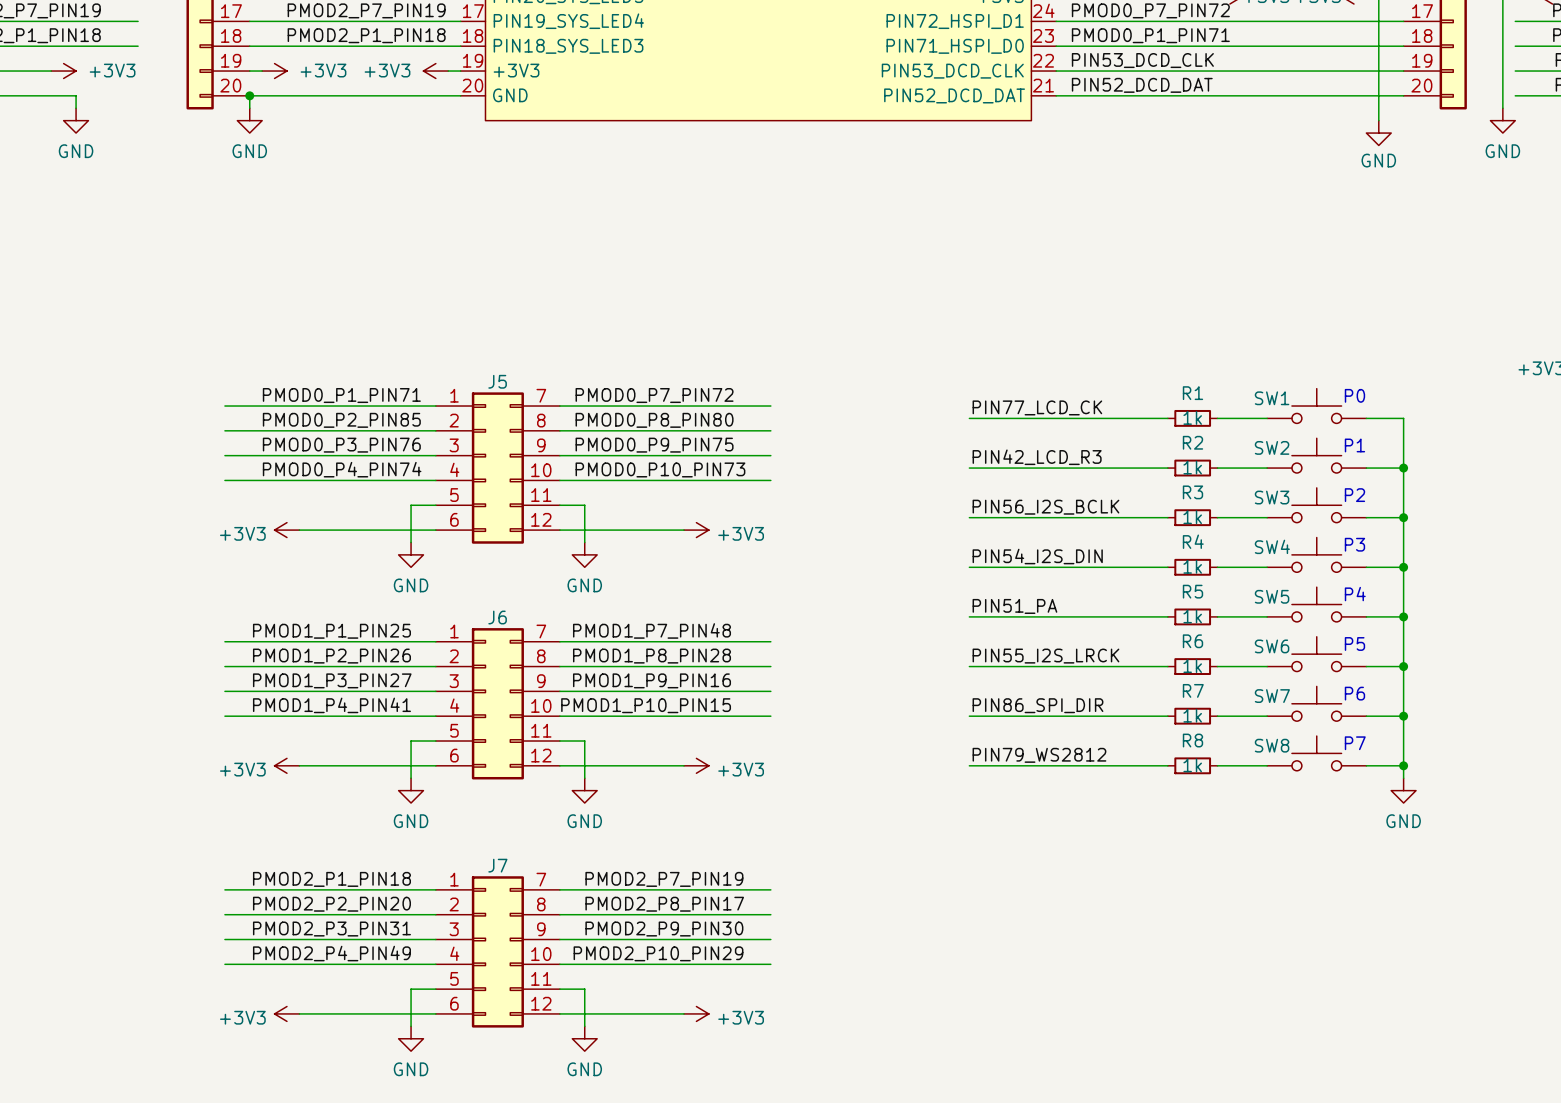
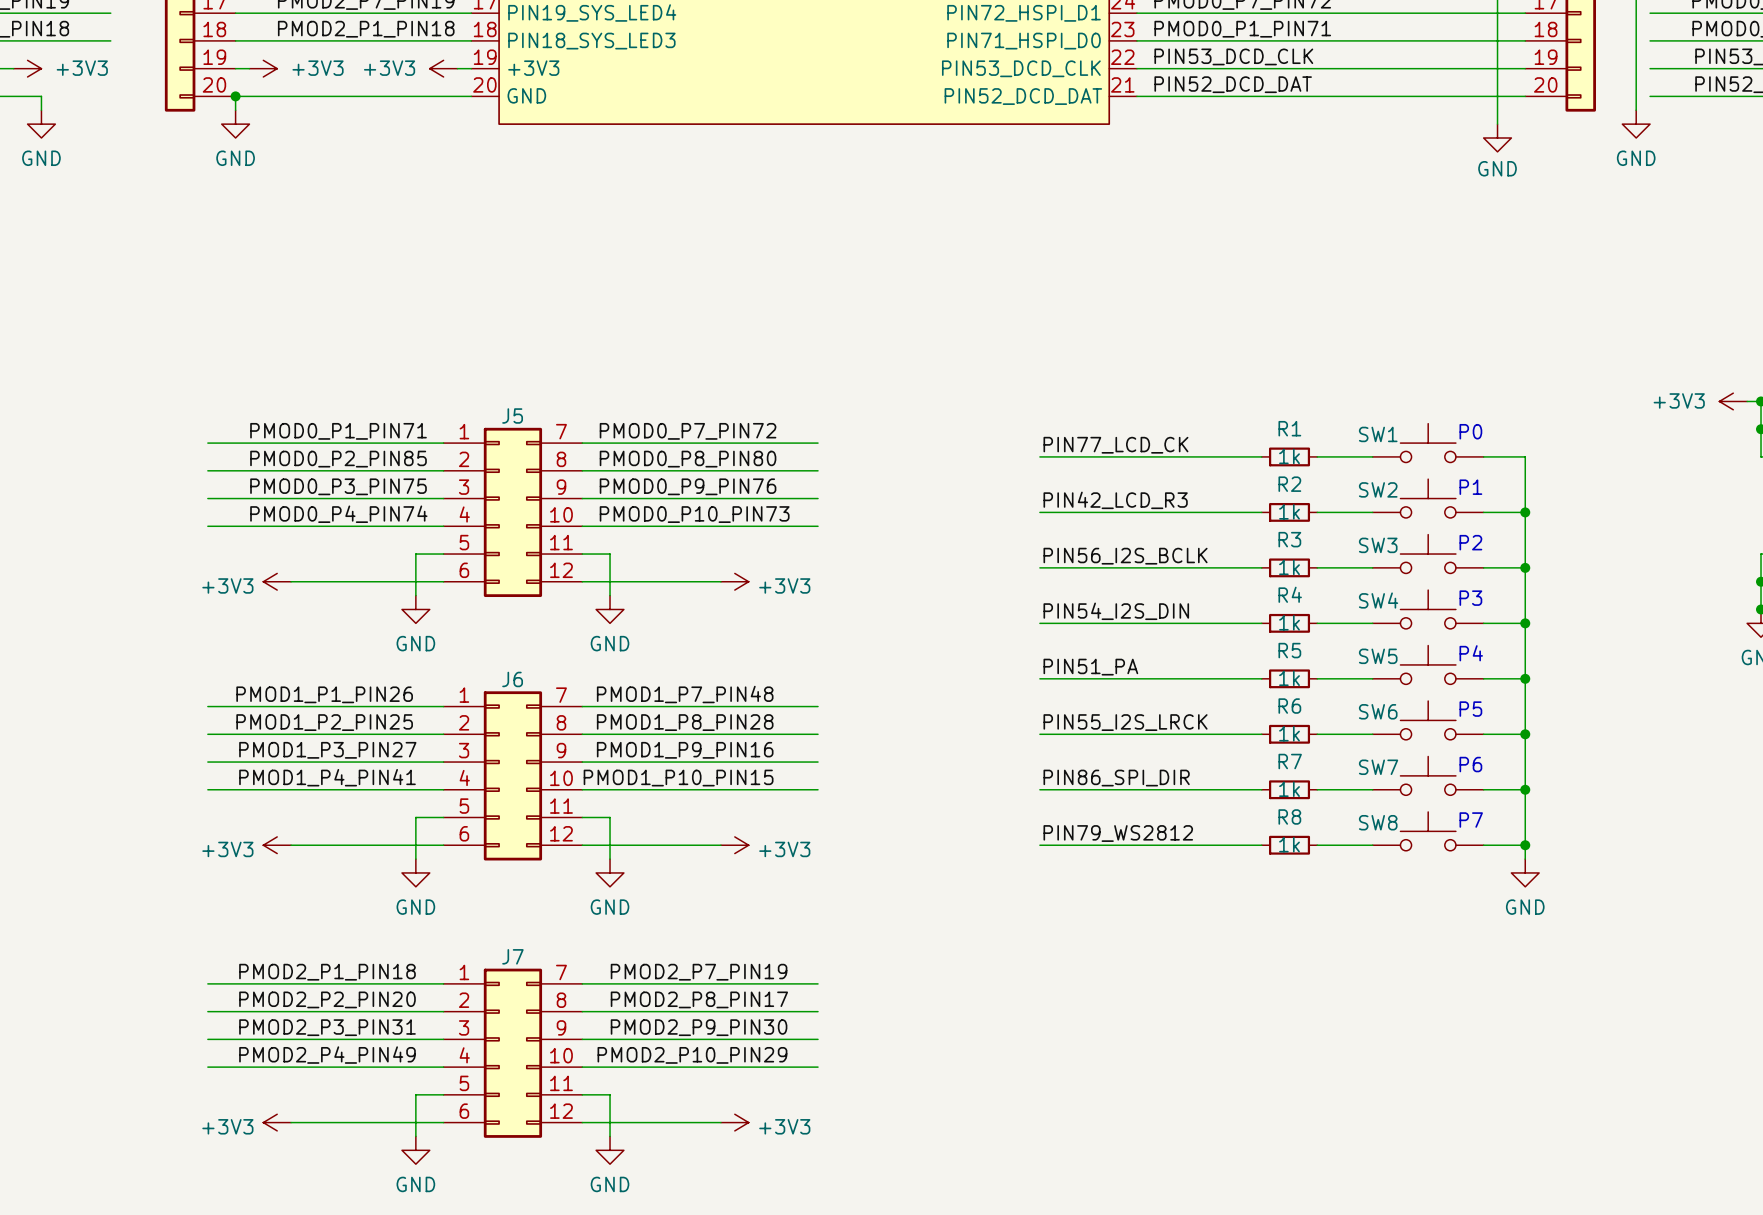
label: PMOD0_P3_PIN76 (341, 445) -> PMOD0_P3_PIN75 (338, 486)
label: PMOD0_P9_PIN75 (654, 445) -> PMOD0_P9_PIN76 (688, 486)
label: none -> PMOD1_P1_PIN26 (324, 694)
label: PMOD1_P1_PIN25 (331, 631) -> none
label: none -> PMOD1_P2_PIN25 (324, 722)
label: PMOD1_P2_PIN26 (331, 656) -> none

